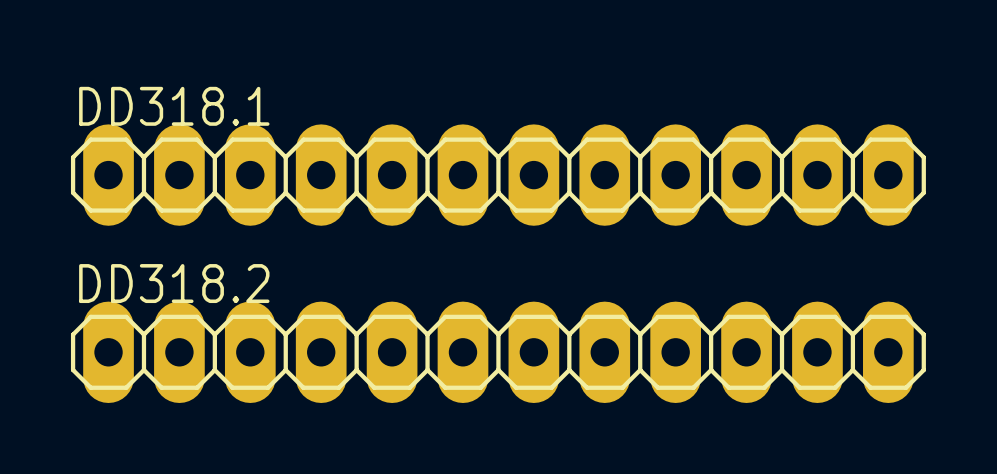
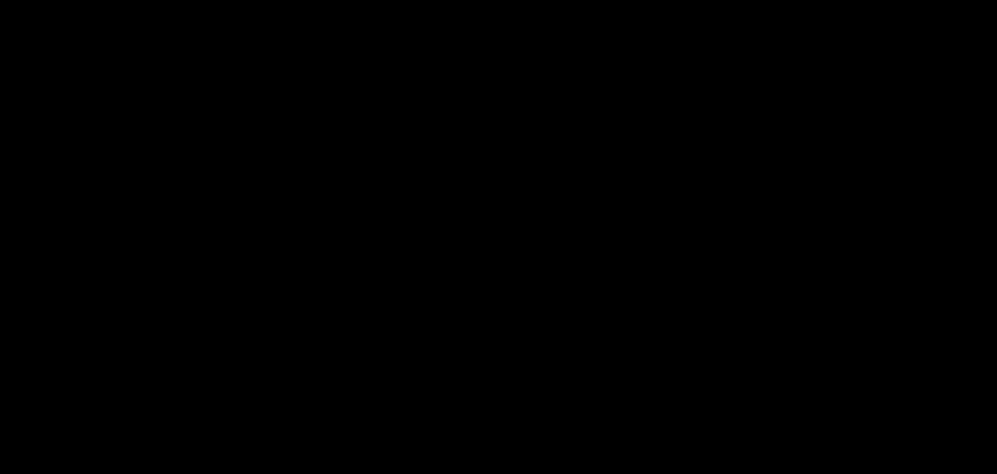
DD318.1: (498, 175) -> none
DD318.2: (498, 352) -> none

